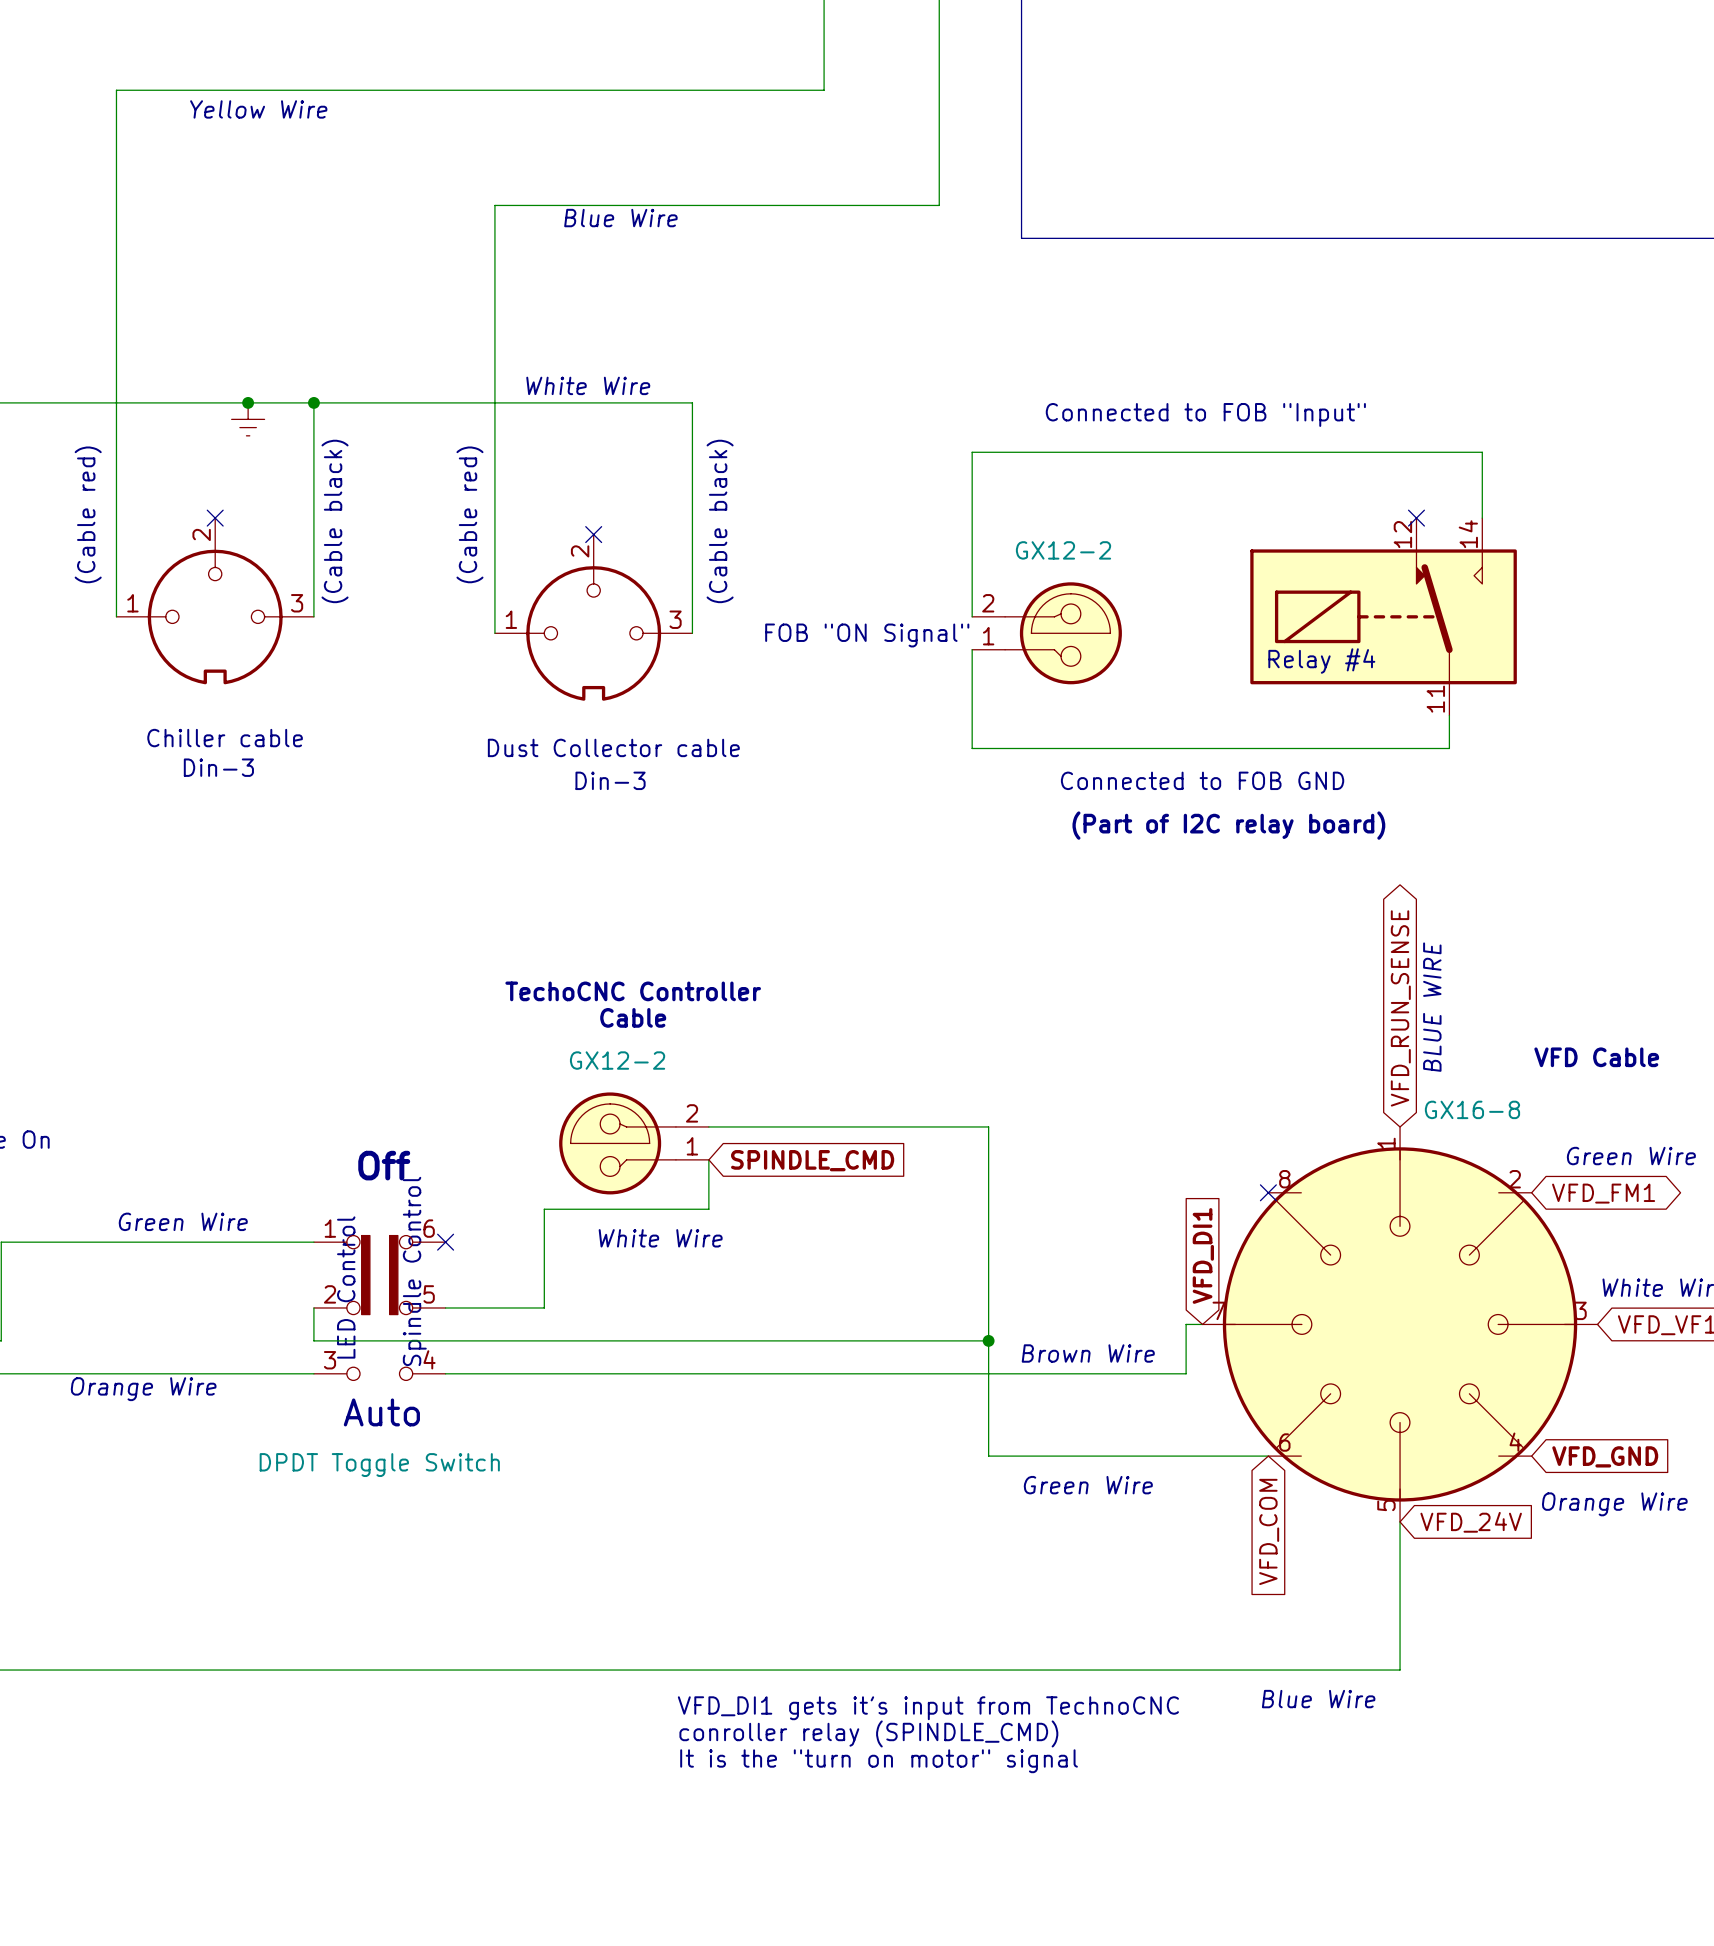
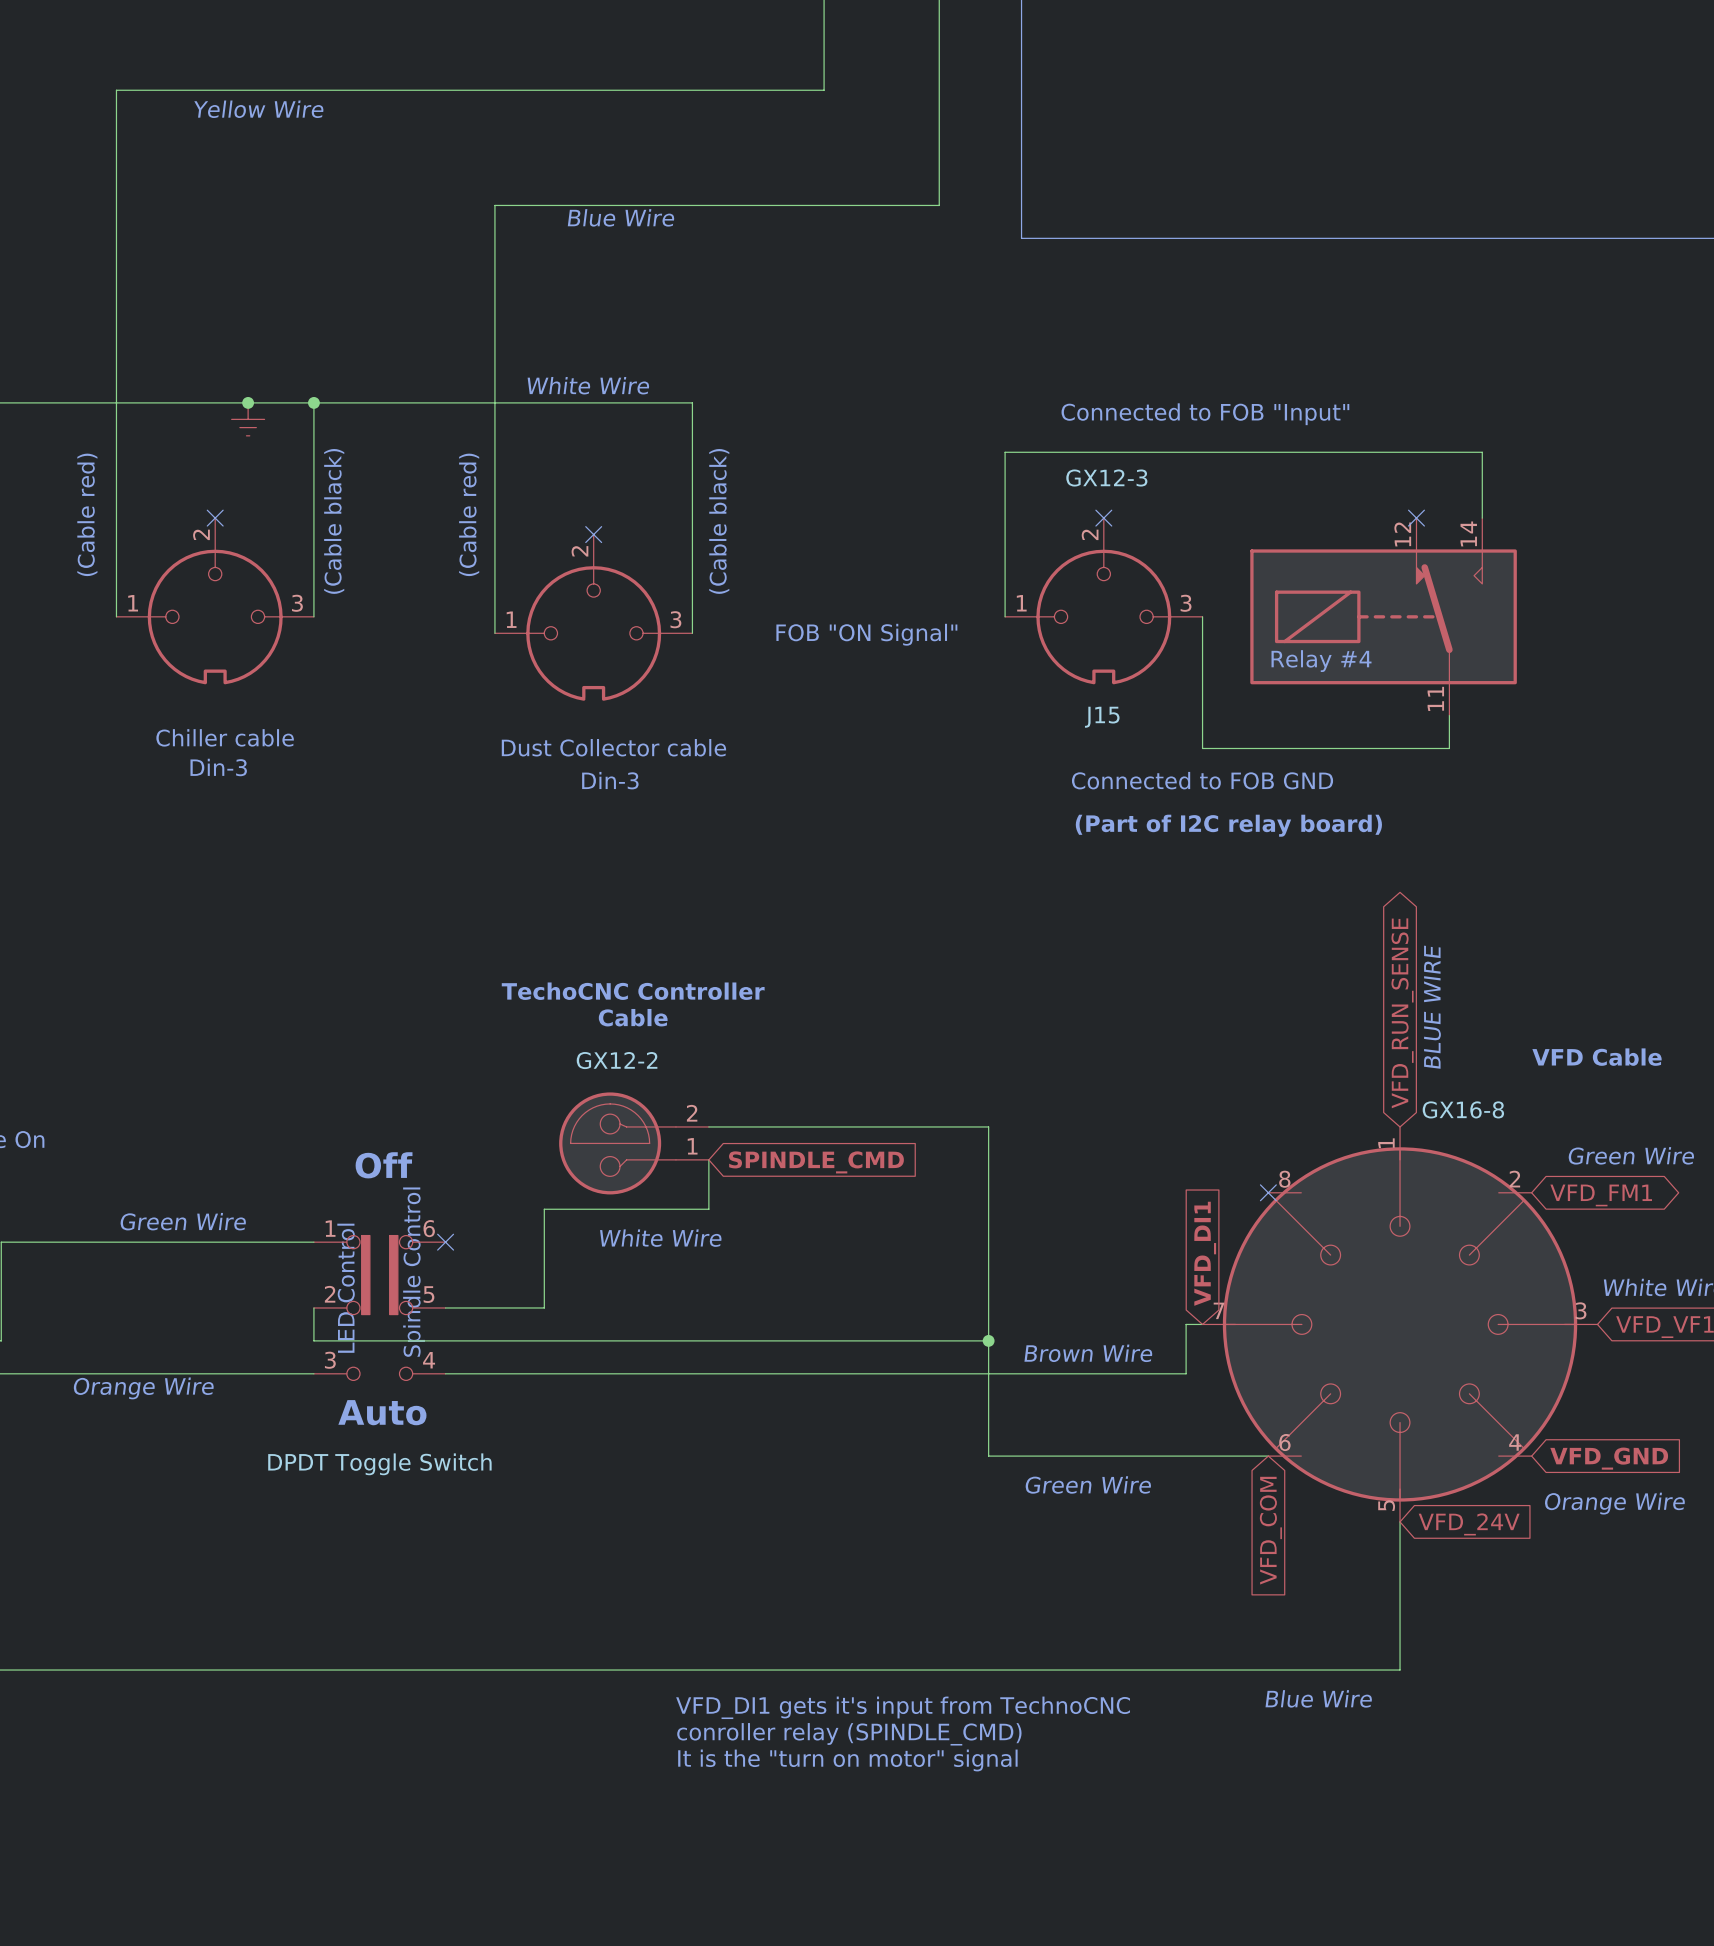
wire: (1005, 452) (972, 452) (972, 616) -> (1005, 452) (1005, 616)
no-connect mark: none -> (1103, 518)
J15: none -> GX12-3 (1103, 601)
part: GX12-2 (1047, 633) -> none
wire: (972, 649) (972, 748) (1202, 748) -> (1202, 616) (1202, 748)

